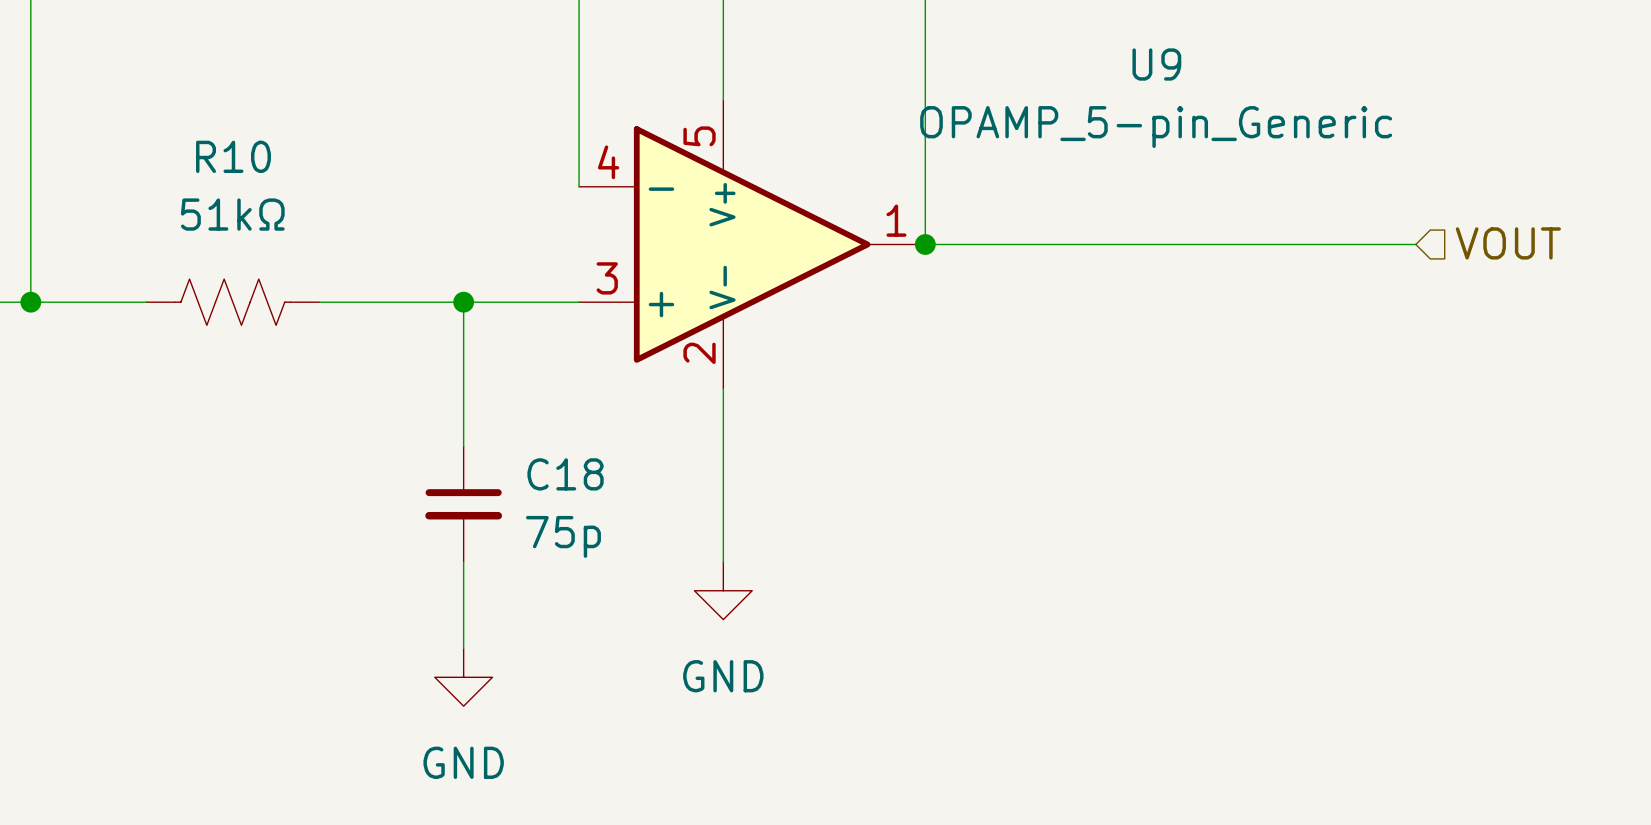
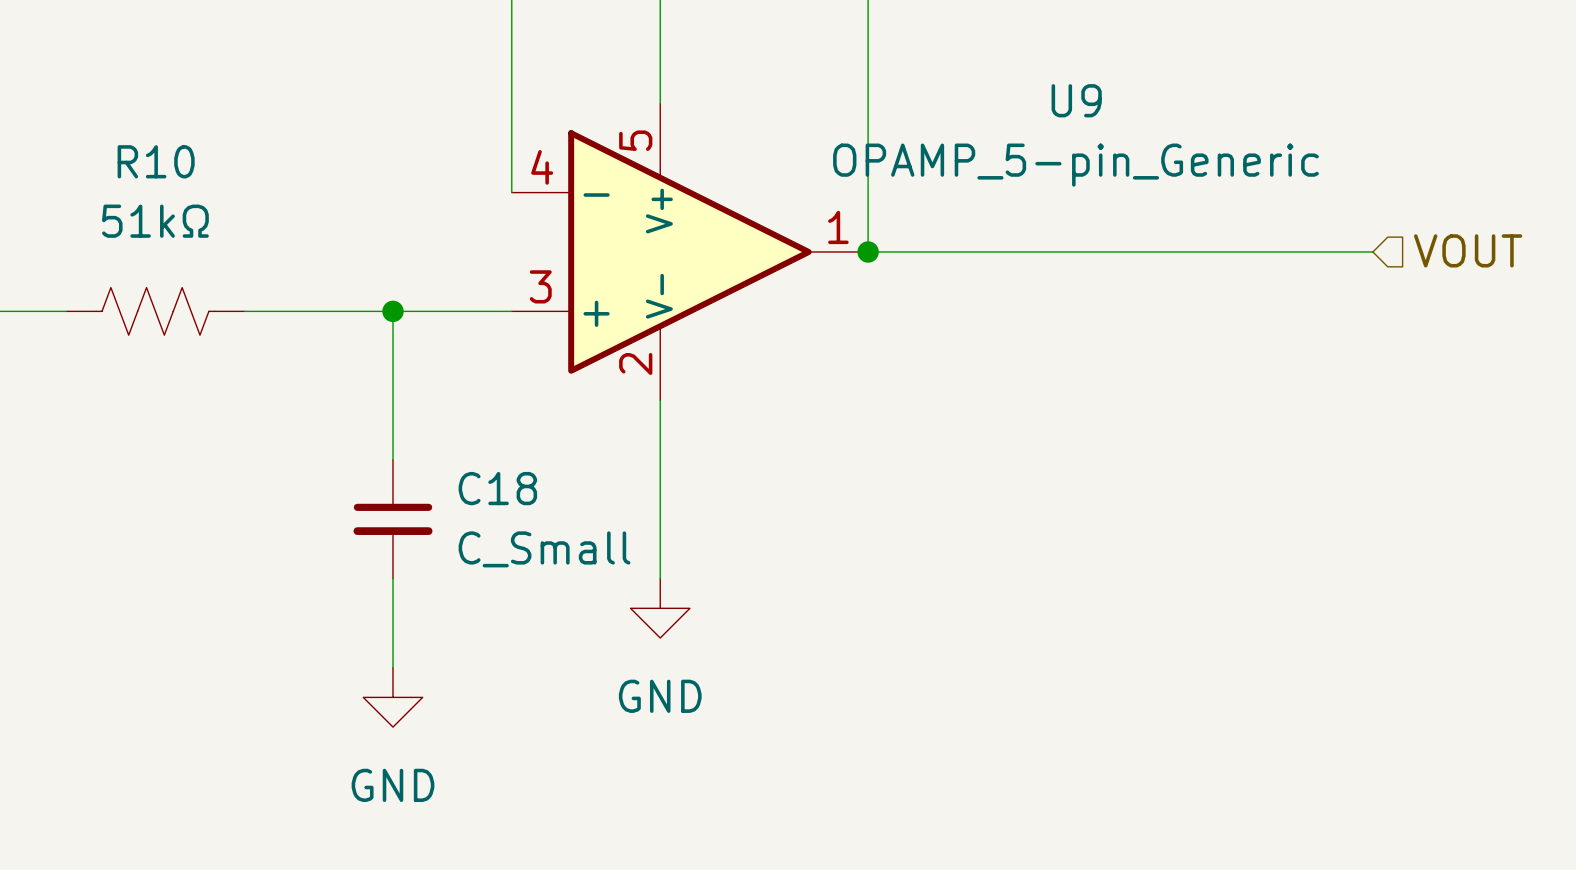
U9 name position: U9 (1156, 64) -> U9 (1076, 100)
U9 value position: OPAMP_5-pin_Generic (1156, 127) -> OPAMP_5-pin_Generic (1075, 165)
C18 value: 75p (563, 536) -> C_Small (544, 549)

